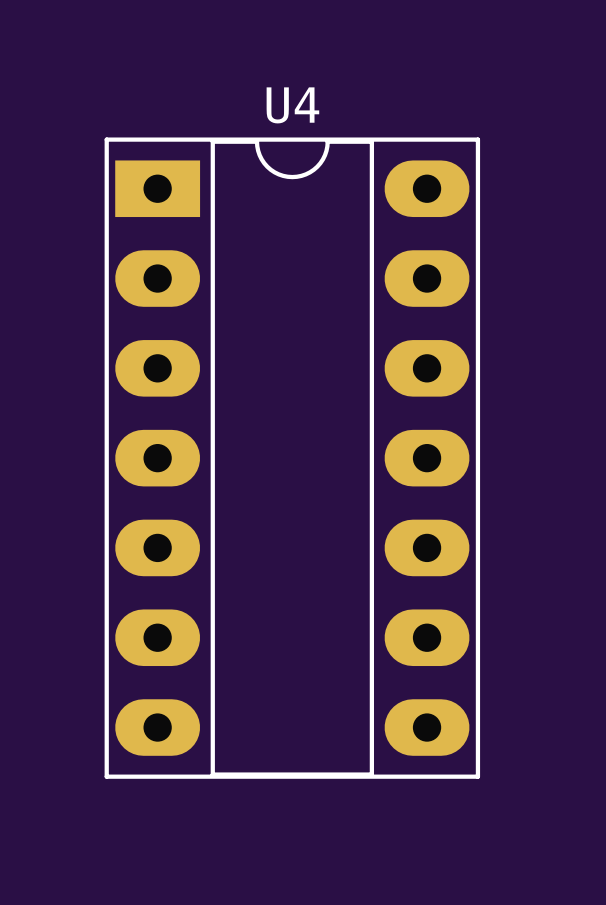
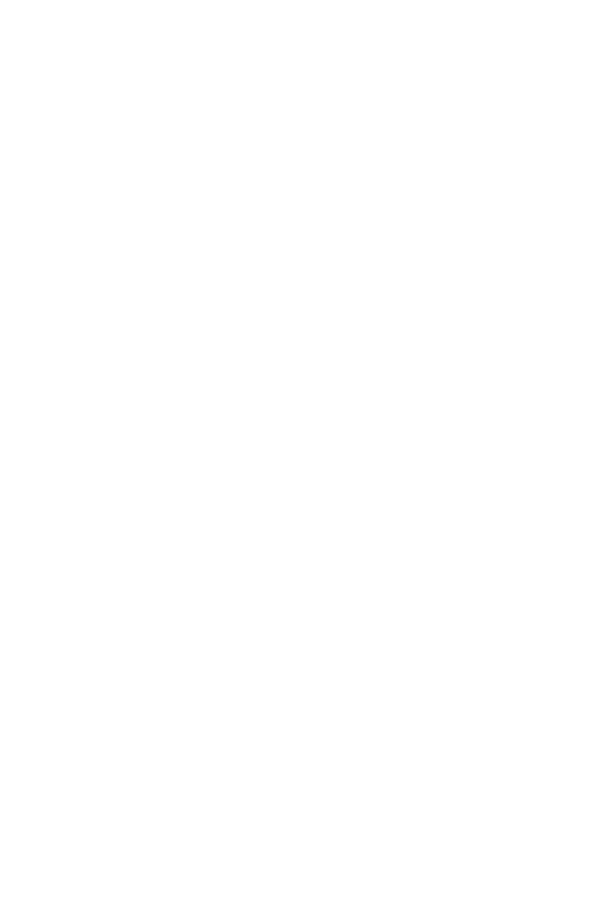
U4: (292, 458) -> none

